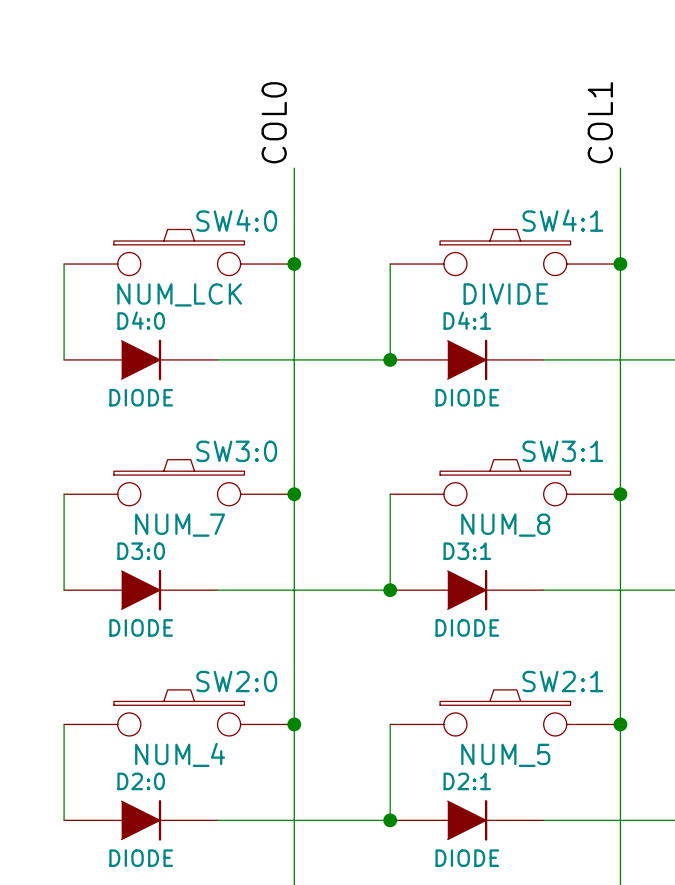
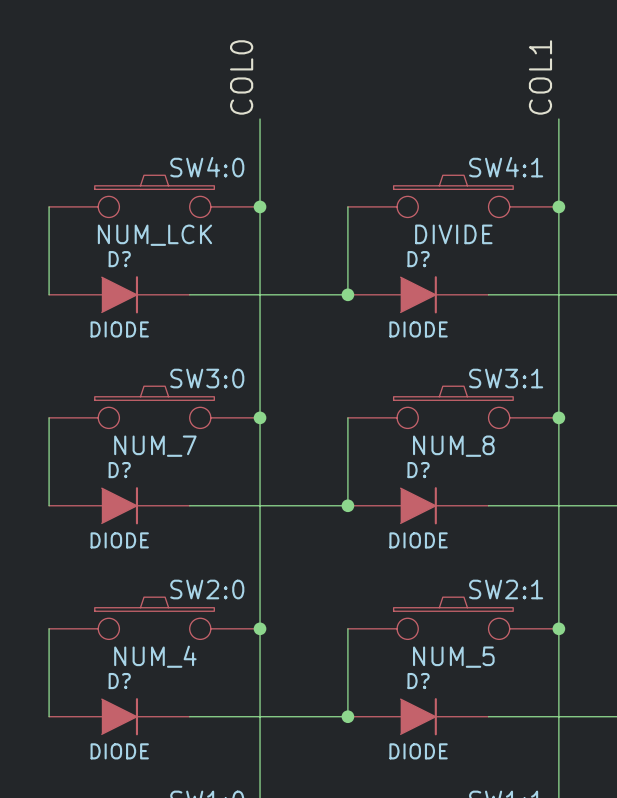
D? name: D4:0 (141, 320) -> D? (119, 259)
D? name: D4:1 (467, 320) -> D? (418, 259)
D? name: D3:0 (141, 551) -> D? (119, 470)
D? name: D3:1 (467, 551) -> D? (418, 470)
D? name: D2:0 (141, 781) -> D? (119, 681)
D? name: D2:1 (467, 781) -> D? (418, 681)

